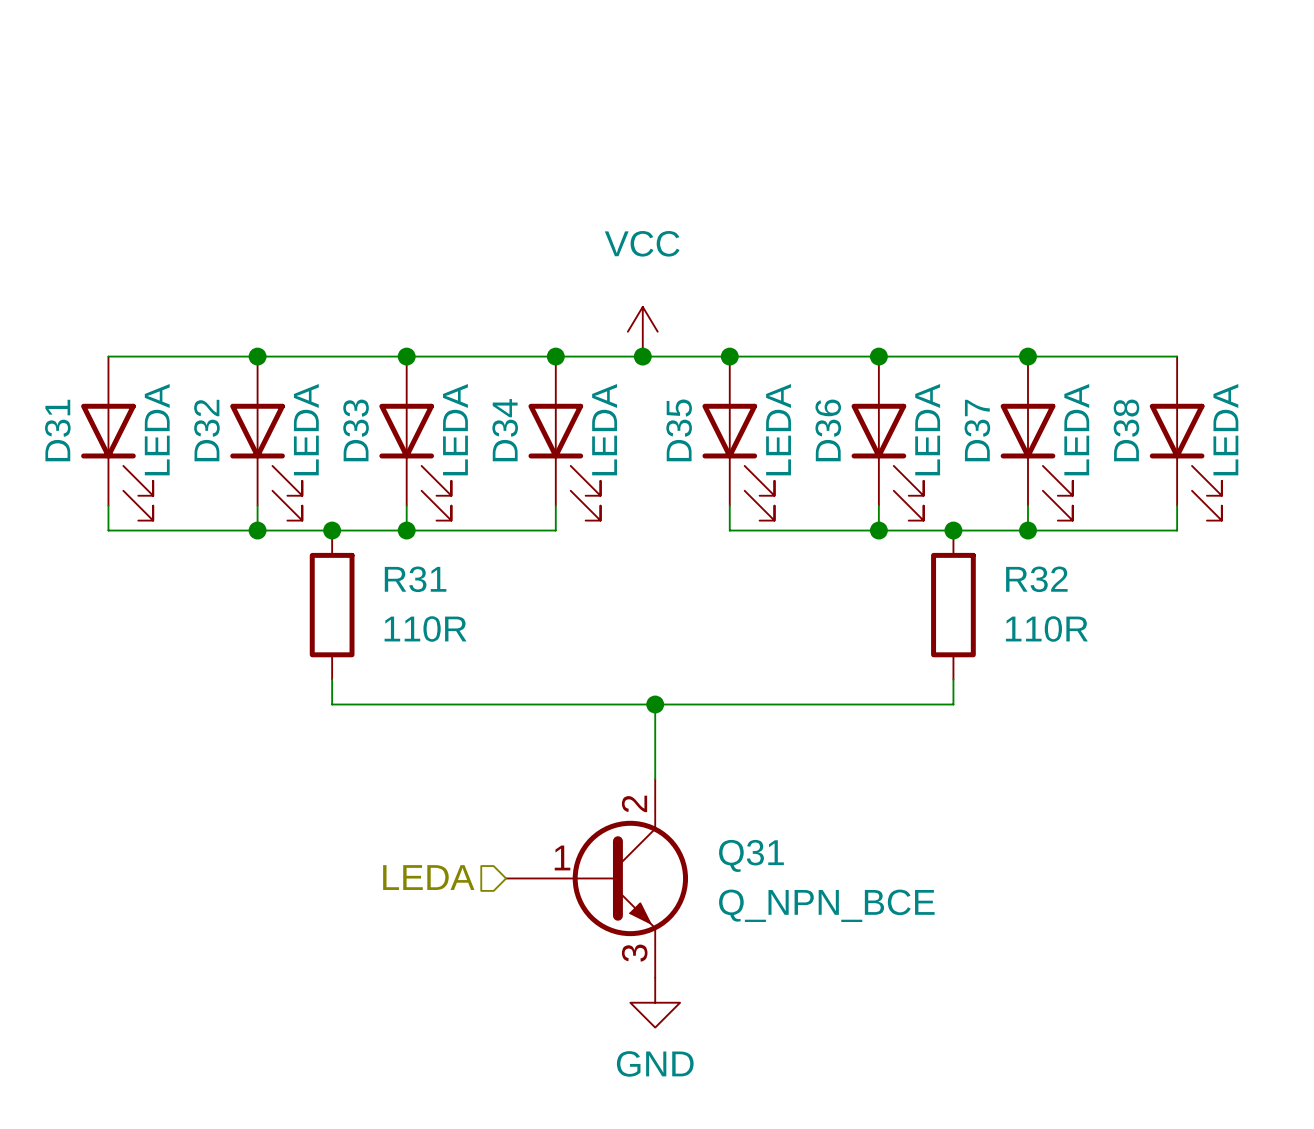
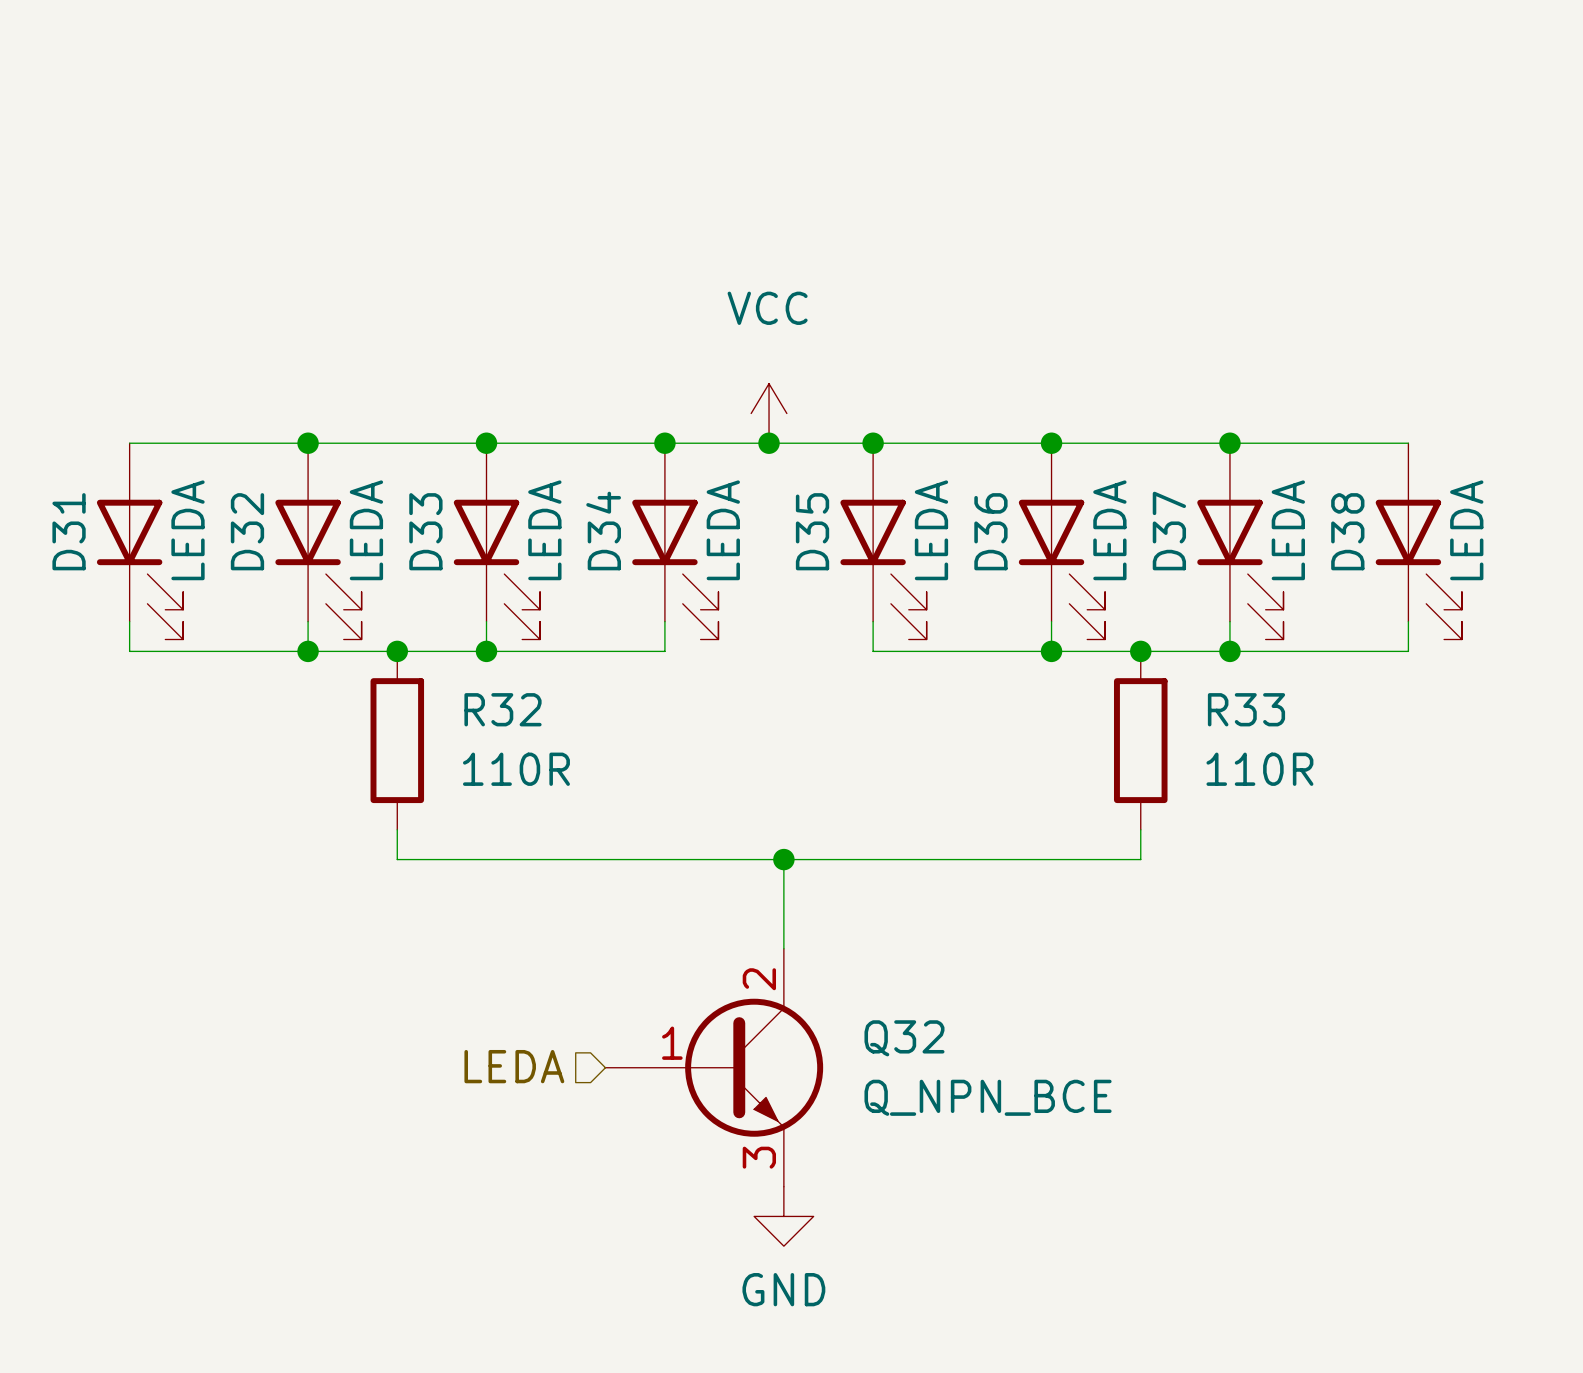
R31 name: R31 (415, 579) -> R32 (503, 709)
R32 name: R32 (1036, 579) -> R33 (1246, 709)
Q31 name: Q31 (751, 855) -> Q32 (904, 1038)

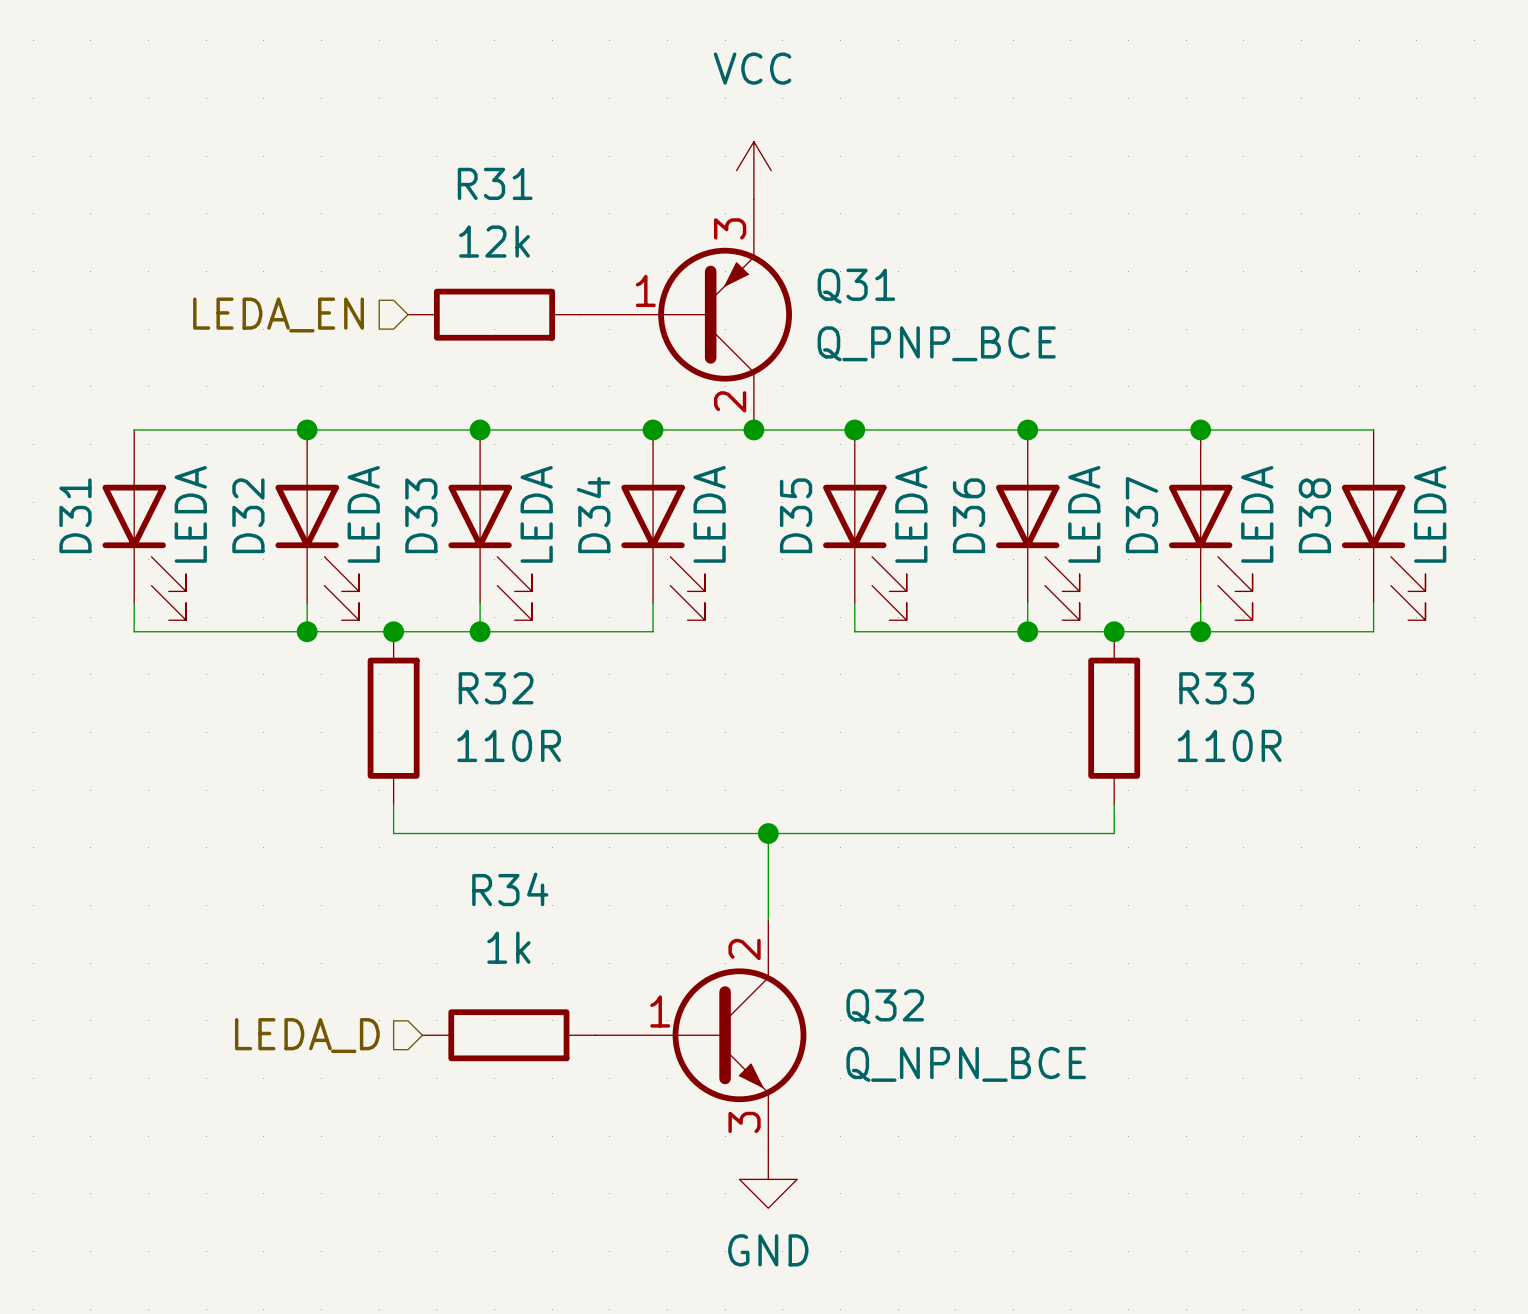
hierarchical label: none -> LEDA_EN (278, 314)
R31: none -> 12k (494, 314)
Q31: none -> Q_PNP_BCE (686, 314)
power symbol position: VCC (769, 413) -> VCC (753, 170)
hierarchical label: LEDA (514, 1066) -> none
R34: none -> 1k (508, 1035)
hierarchical label: none -> LEDA_D (307, 1035)

